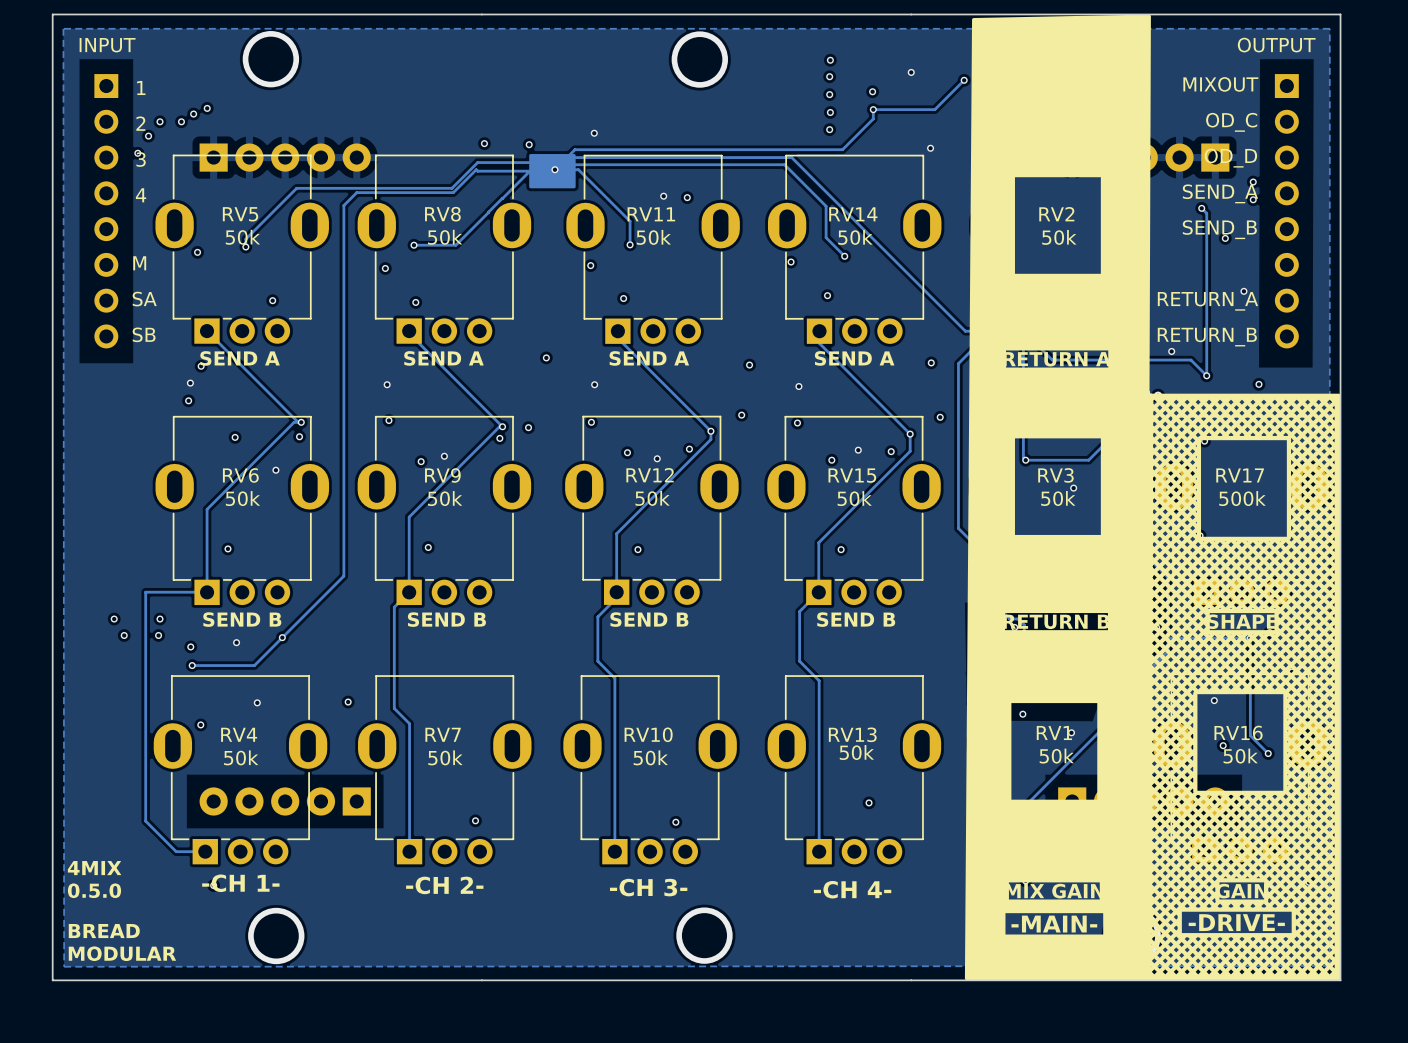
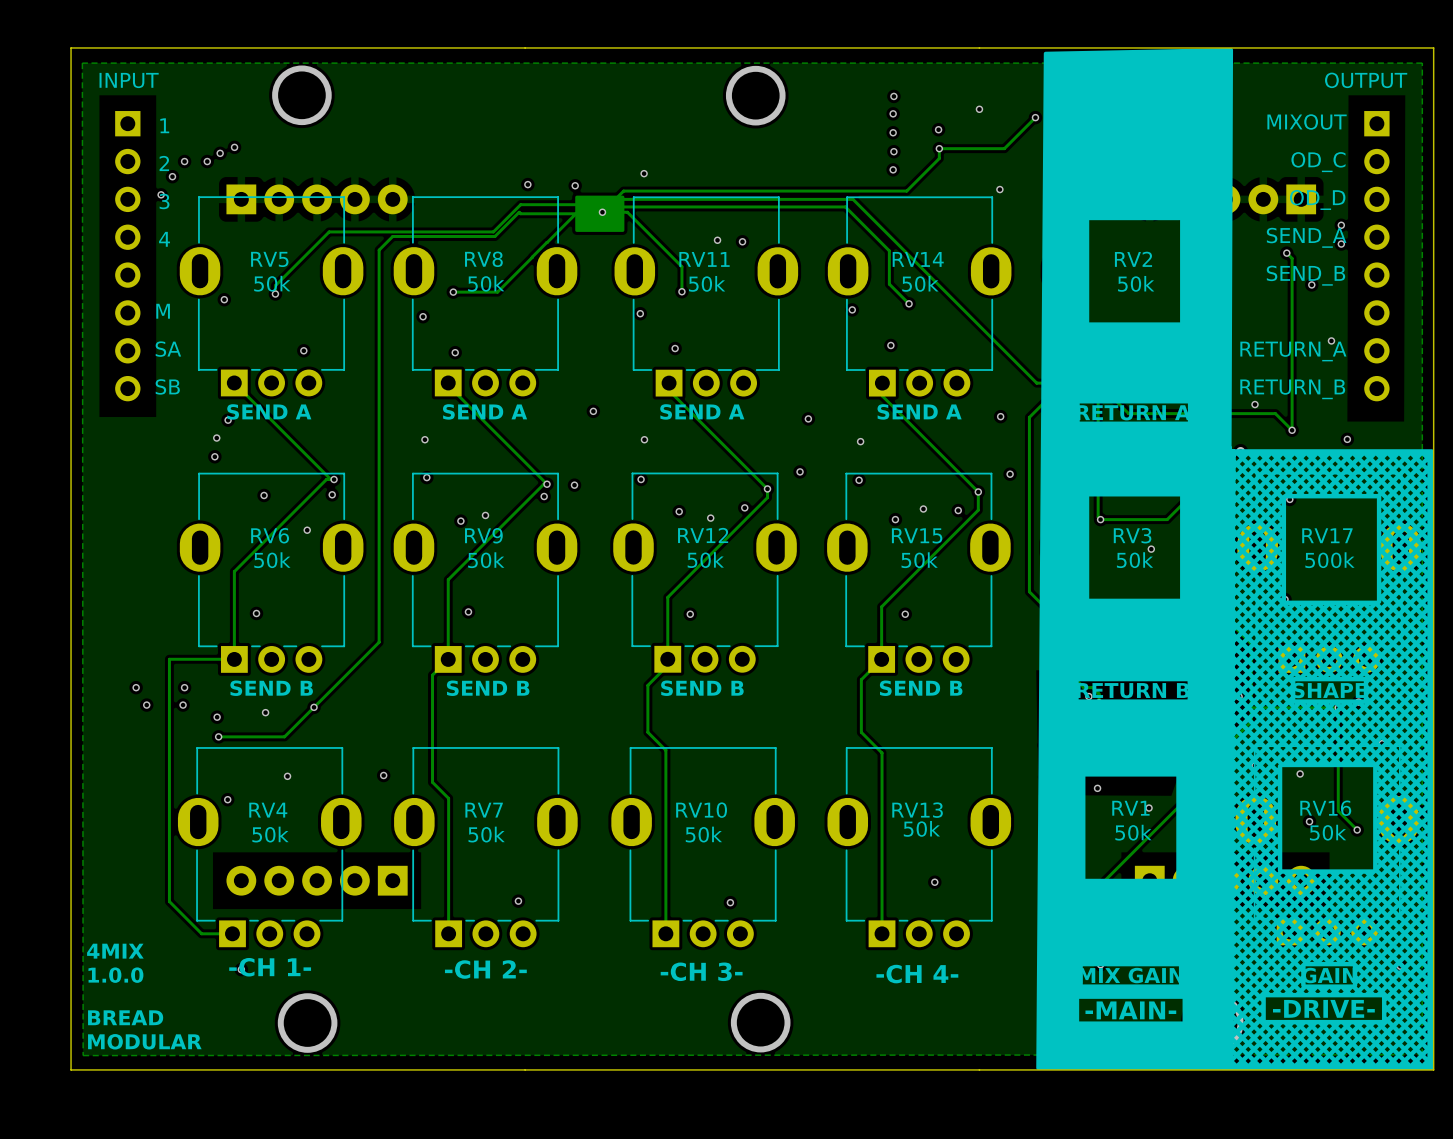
text: 0.5.0 (94, 890) -> 1.0.0 (115, 975)

